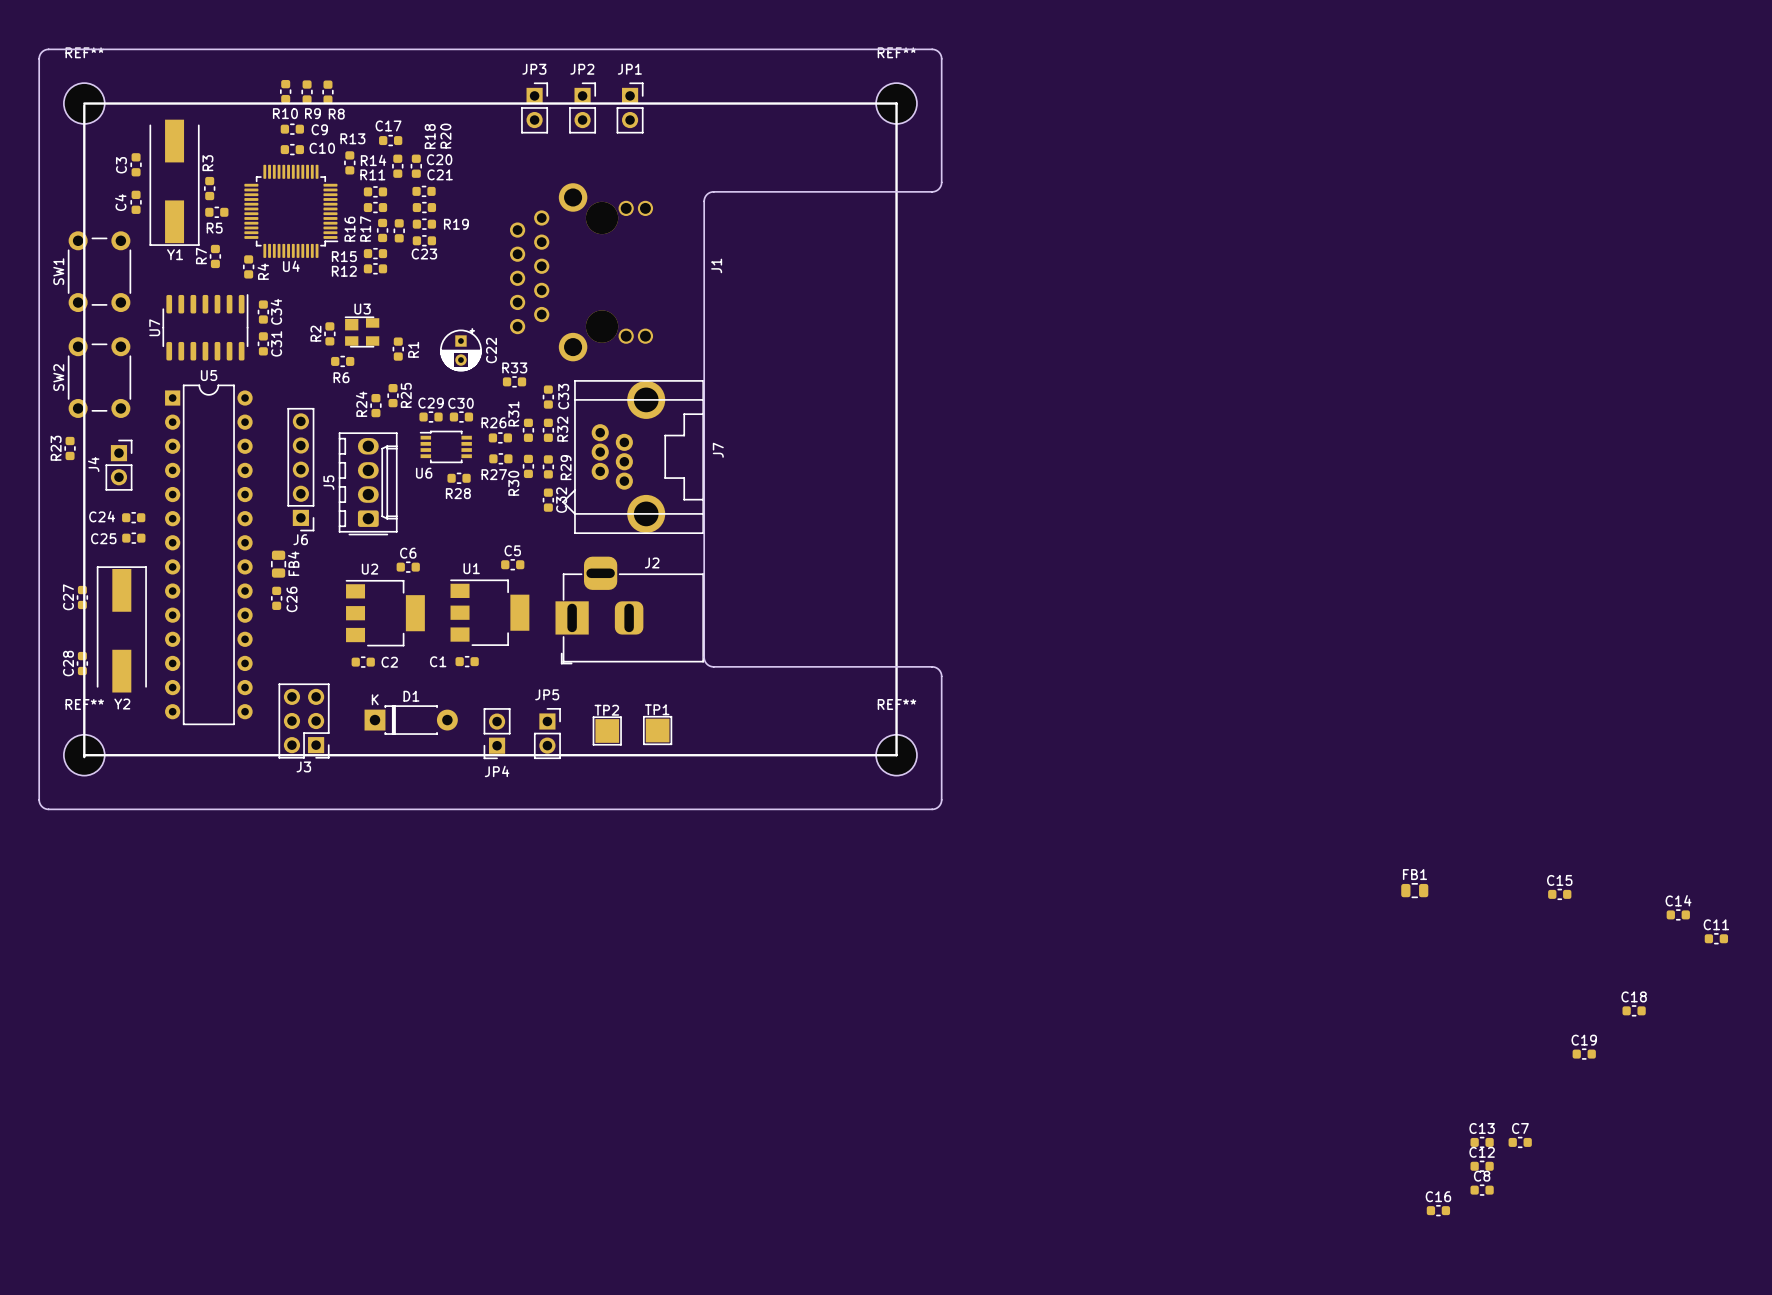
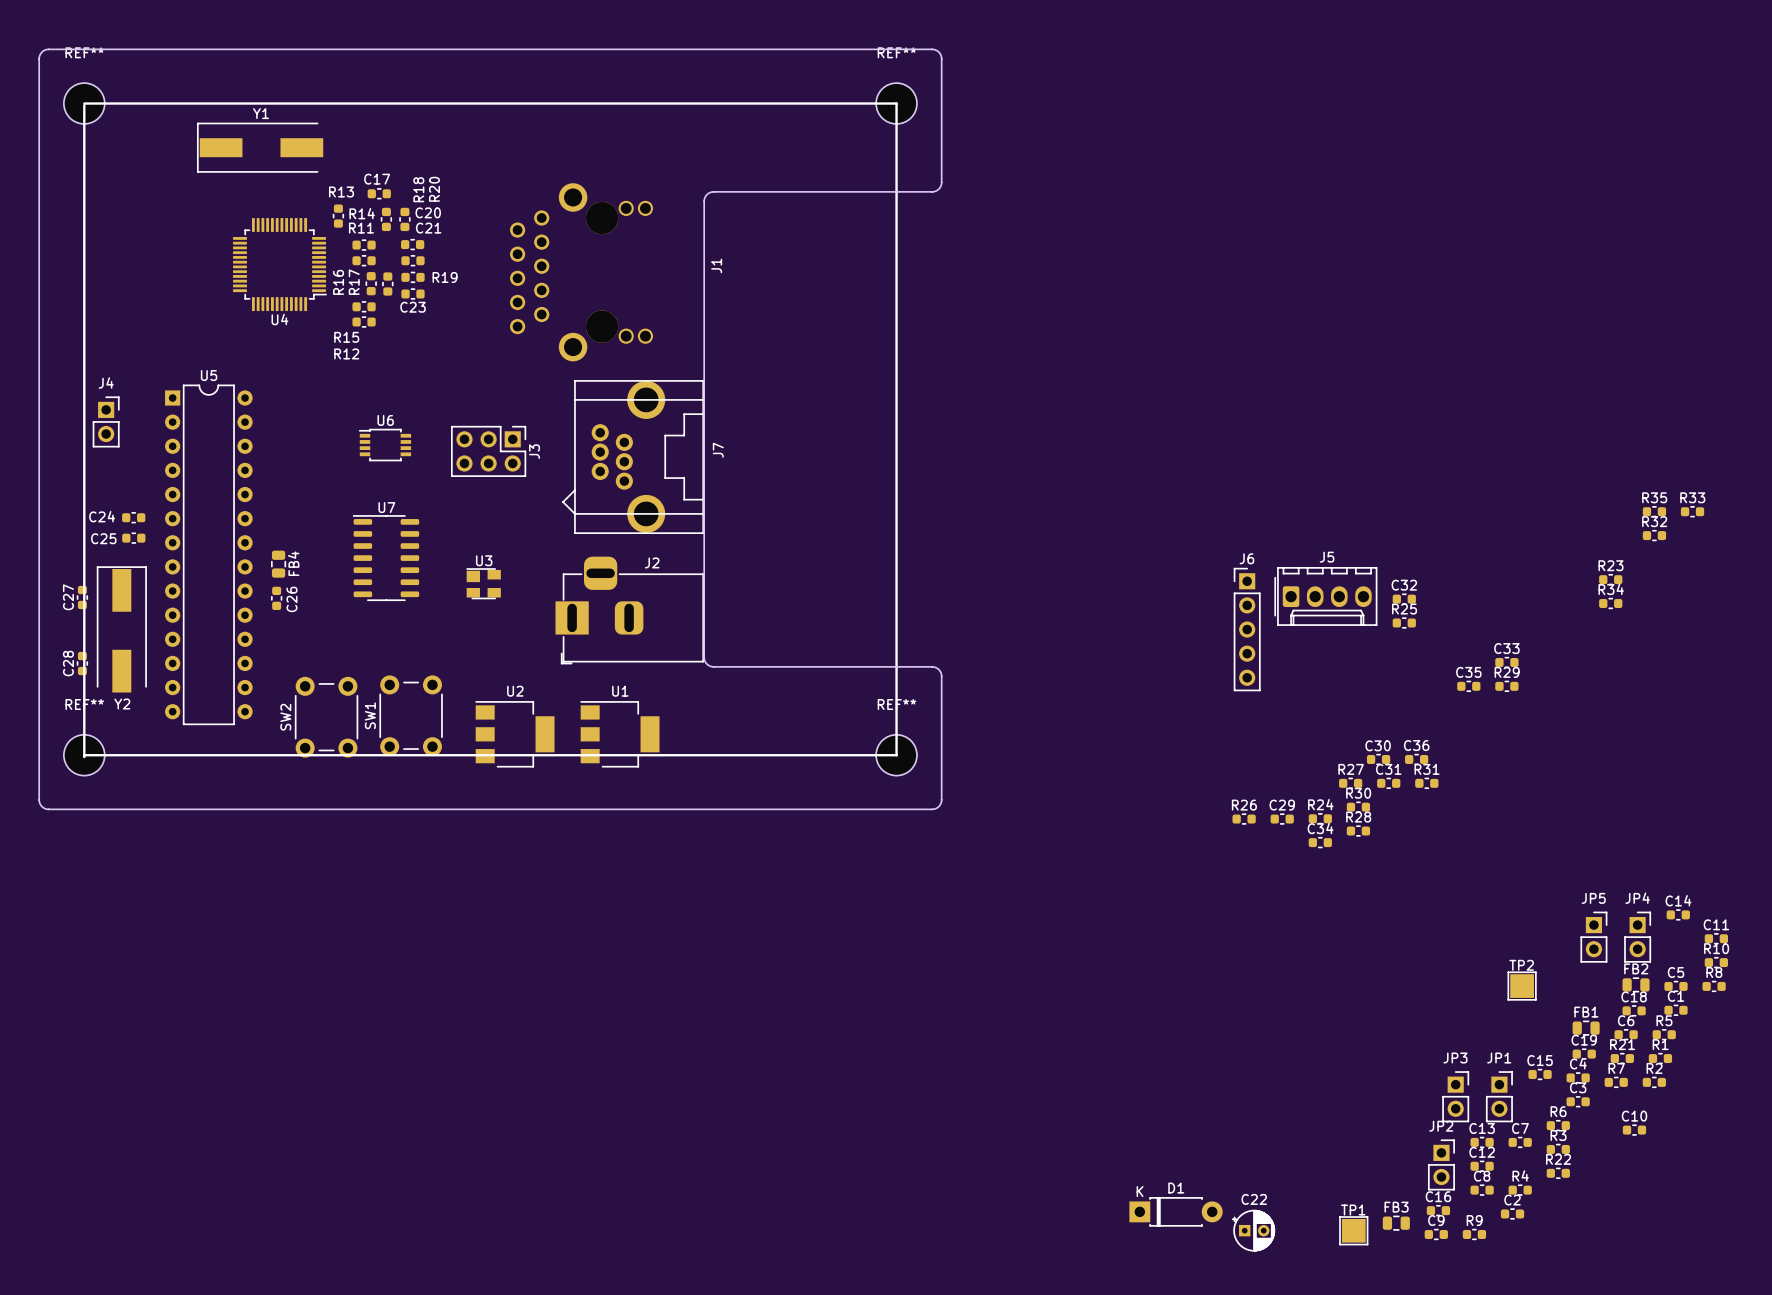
R10 rotation: 0° (285, 91) -> 90° clockwise (1716, 962)
R10 position: (285, 91) -> (1716, 962)
R9 rotation: 0° (307, 92) -> 90° clockwise (1474, 1234)
R9 position: (307, 92) -> (1474, 1234)
R8 rotation: 0° (327, 92) -> 90° clockwise (1714, 986)
R8 position: (327, 92) -> (1714, 986)
JP3 position: (534, 107) -> (1455, 1096)
JP2 position: (582, 107) -> (1441, 1164)
JP1 position: (630, 107) -> (1499, 1096)
R10 name position: R10 (285, 113) -> R10 (1716, 948)
R9 name position: R9 (313, 113) -> R9 (1474, 1220)
R8 name position: R8 (336, 114) -> R8 (1714, 972)
C9 position: (292, 129) -> (1436, 1234)
C9 name position: C9 (319, 129) -> C9 (1436, 1220)
C17 position: (390, 140) -> (379, 193)
C10 name position: C10 (322, 148) -> C10 (1634, 1116)
C10 position: (292, 149) -> (1634, 1130)
R13 position: (349, 162) -> (338, 216)
C3 rotation: 0° (136, 164) -> 90° clockwise (1578, 1101)
C3 position: (136, 164) -> (1578, 1101)
R18 position: (397, 166) -> (386, 219)
R20 position: (416, 166) -> (404, 219)
Y1 rotation: 0° (174, 182) -> 90° clockwise (260, 147)
Y1 position: (174, 182) -> (260, 147)
R3 rotation: 0° (209, 188) -> 90° clockwise (1558, 1149)
R3 position: (209, 188) -> (1558, 1149)
R14 position: (375, 191) -> (364, 245)
C20 position: (424, 191) -> (412, 244)
C4 rotation: 0° (136, 202) -> 90° clockwise (1578, 1077)
C4 position: (136, 202) -> (1578, 1077)
R11 position: (375, 207) -> (364, 260)
C21 position: (424, 207) -> (412, 260)
U4 position: (291, 211) -> (279, 264)
R5 position: (216, 212) -> (1664, 1034)
R19 position: (424, 224) -> (412, 277)
R5 name position: R5 (214, 228) -> R5 (1664, 1020)
R17 position: (382, 230) -> (371, 283)
R16 position: (399, 230) -> (387, 284)
C23 position: (424, 240) -> (412, 293)
R15 position: (375, 253) -> (364, 306)
Y1 name position: Y1 (175, 254) -> Y1 (261, 113)
R7 rotation: 0° (215, 256) -> 90° clockwise (1616, 1082)
R7 position: (215, 256) -> (1616, 1082)
R15 name position: R15 (344, 256) -> R15 (346, 337)
R4 rotation: 0° (248, 266) -> 90° clockwise (1520, 1190)
R4 position: (248, 266) -> (1520, 1190)
R12 position: (375, 268) -> (364, 322)
SW1 position: (99, 271) -> (411, 715)
R4 name position: R4 (263, 271) -> R4 (1520, 1175)
R12 name position: R12 (344, 271) -> R12 (346, 353)
C34 name position: C34 (276, 311) -> C34 (1320, 828)
C34 rotation: 0° (263, 312) -> 90° clockwise (1320, 842)
C34 position: (263, 312) -> (1320, 842)
U7 name position: U7 (154, 327) -> U7 (386, 507)
U7 rotation: 0° (205, 327) -> 90° counterclockwise (386, 558)
U7 position: (205, 327) -> (386, 558)
U3 position: (362, 331) -> (483, 583)
R2 rotation: 0° (329, 333) -> 90° clockwise (1654, 1082)
R2 position: (329, 333) -> (1654, 1082)
C31 rotation: 0° (263, 343) -> 90° clockwise (1388, 783)
C31 position: (263, 343) -> (1388, 783)
C31 name position: C31 (276, 343) -> C31 (1388, 769)
R1 rotation: 0° (398, 349) -> 90° clockwise (1660, 1058)
R1 position: (398, 349) -> (1660, 1058)
R1 name position: R1 (413, 349) -> R1 (1660, 1044)
C22 rotation: 0° (460, 349) -> 90° counterclockwise (1253, 1230)
C22 position: (460, 349) -> (1253, 1230)
R6 position: (342, 361) -> (1558, 1125)
SW2 position: (99, 377) -> (326, 717)
R6 name position: R6 (341, 377) -> R6 (1558, 1111)
R33 position: (514, 381) -> (1692, 511)
R25 rotation: 0° (393, 395) -> 90° clockwise (1404, 622)
R25 position: (393, 395) -> (1404, 622)
R25 name position: R25 (406, 395) -> R25 (1404, 609)
C33 name position: C33 (563, 396) -> C33 (1506, 648)
C33 rotation: 0° (548, 397) -> 90° clockwise (1506, 662)
C33 position: (548, 397) -> (1506, 662)
R24 rotation: 0° (375, 405) -> 90° clockwise (1320, 818)
R24 position: (375, 405) -> (1320, 818)
C29 position: (431, 417) -> (1282, 819)
C30 position: (461, 417) -> (1378, 759)
R26 name position: R26 (493, 422) -> R26 (1244, 805)
R32 name position: R32 (562, 429) -> R32 (1654, 521)
R31 rotation: 0° (528, 430) -> 90° clockwise (1426, 783)
R31 position: (528, 430) -> (1426, 783)
R32 rotation: 0° (548, 430) -> 90° clockwise (1654, 535)
R32 position: (548, 430) -> (1654, 535)
R26 position: (500, 437) -> (1244, 819)
U6 position: (445, 446) -> (385, 445)
R23 rotation: 0° (70, 448) -> 90° clockwise (1610, 579)
R23 position: (70, 448) -> (1610, 579)
R27 position: (500, 458) -> (1350, 783)
J4 name rotation: 0° (93, 464) -> 90° clockwise (106, 382)
J4 name position: J4 (93, 464) -> J4 (106, 382)
J4 position: (118, 465) -> (106, 421)
R30 rotation: 0° (528, 466) -> 90° clockwise (1358, 807)
R30 position: (528, 466) -> (1358, 807)
R29 rotation: 0° (548, 466) -> 90° clockwise (1506, 686)
R29 position: (548, 466) -> (1506, 686)
R29 name position: R29 (566, 467) -> R29 (1507, 672)
J6 rotation: 0° (300, 469) -> 180° (1247, 629)
J6 position: (300, 469) -> (1247, 629)
U6 name position: U6 (424, 473) -> U6 (385, 420)
R27 name position: R27 (494, 474) -> R27 (1351, 769)
R28 position: (459, 478) -> (1358, 831)
J5 rotation: 0° (368, 483) -> 90° clockwise (1325, 596)
J5 position: (368, 483) -> (1325, 596)
R28 name position: R28 (458, 493) -> R28 (1358, 817)
C32 rotation: 0° (548, 500) -> 90° clockwise (1404, 599)
C32 position: (548, 500) -> (1404, 599)
C32 name position: C32 (561, 500) -> C32 (1404, 585)
R35: none -> (1654, 511)
C5 position: (512, 564) -> (1676, 986)
C6 position: (408, 567) -> (1626, 1034)
U1 name position: U1 (471, 568) -> U1 (620, 691)
U2 name position: U2 (370, 569) -> U2 (515, 691)
R34: none -> (1610, 603)
U1 position: (489, 612) -> (620, 734)
U2 position: (385, 613) -> (515, 734)
C1 name position: C1 (438, 661) -> C1 (1676, 996)
C1 position: (467, 661) -> (1676, 1010)
C2 position: (363, 662) -> (1512, 1213)
C2 name position: C2 (389, 662) -> C2 (1512, 1200)
C35: none -> (1468, 686)
D1 position: (411, 720) -> (1176, 1211)
J3 rotation: 0° (304, 721) -> 90° counterclockwise (488, 451)
J3 position: (304, 721) -> (488, 451)
TP2 position: (607, 730) -> (1522, 986)
TP1 position: (657, 730) -> (1353, 1230)
JP4 rotation: 0° (497, 733) -> 180° (1637, 937)
JP4 position: (497, 733) -> (1637, 937)
JP5 position: (547, 733) -> (1593, 937)
C36: none -> (1416, 759)
FB1 position: (1414, 890) -> (1586, 1028)
C15 position: (1559, 894) -> (1540, 1074)
FB2: none -> (1636, 984)
R21: none -> (1622, 1058)
R22: none -> (1558, 1173)
FB3: none -> (1396, 1223)

